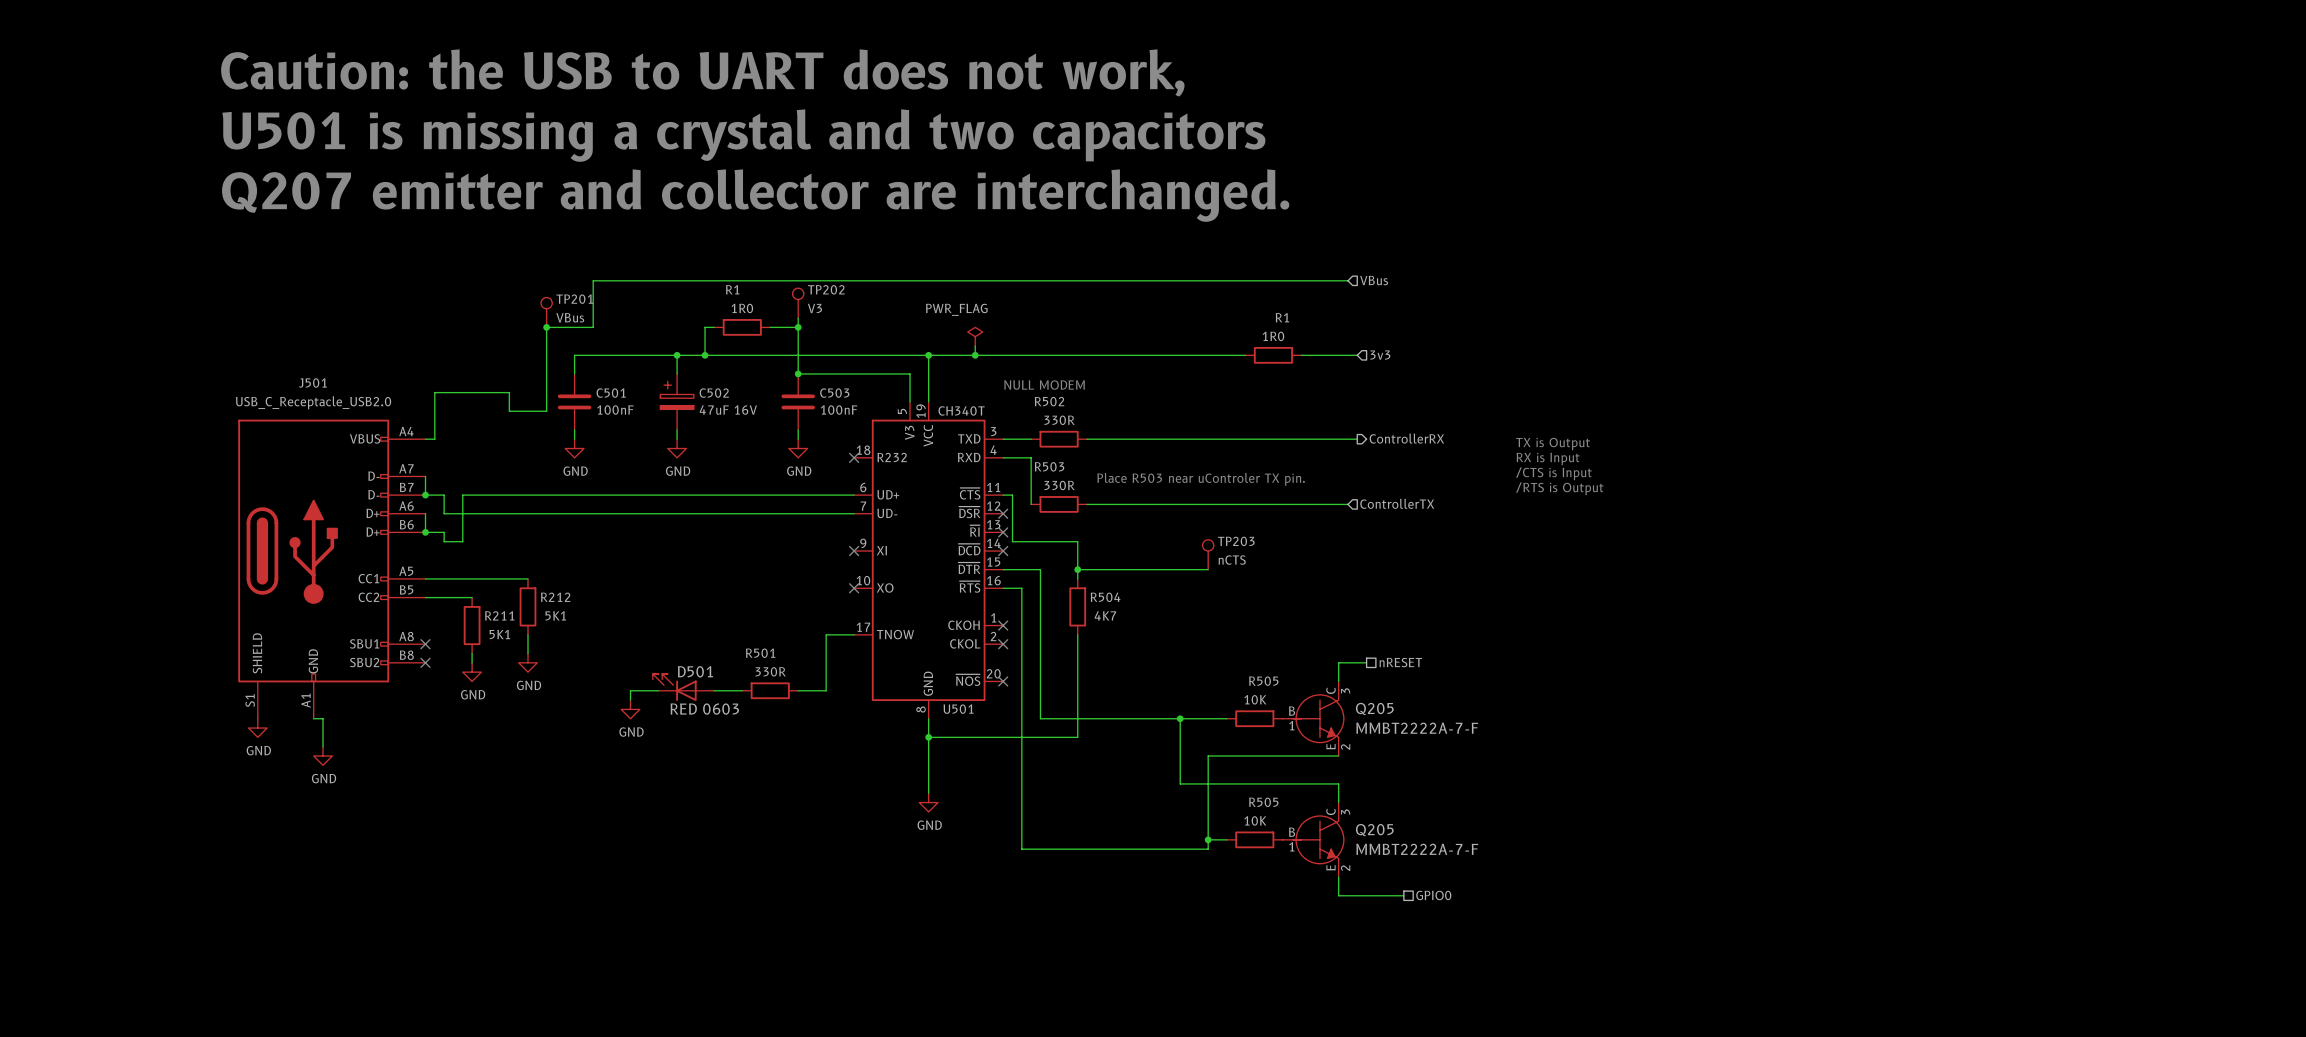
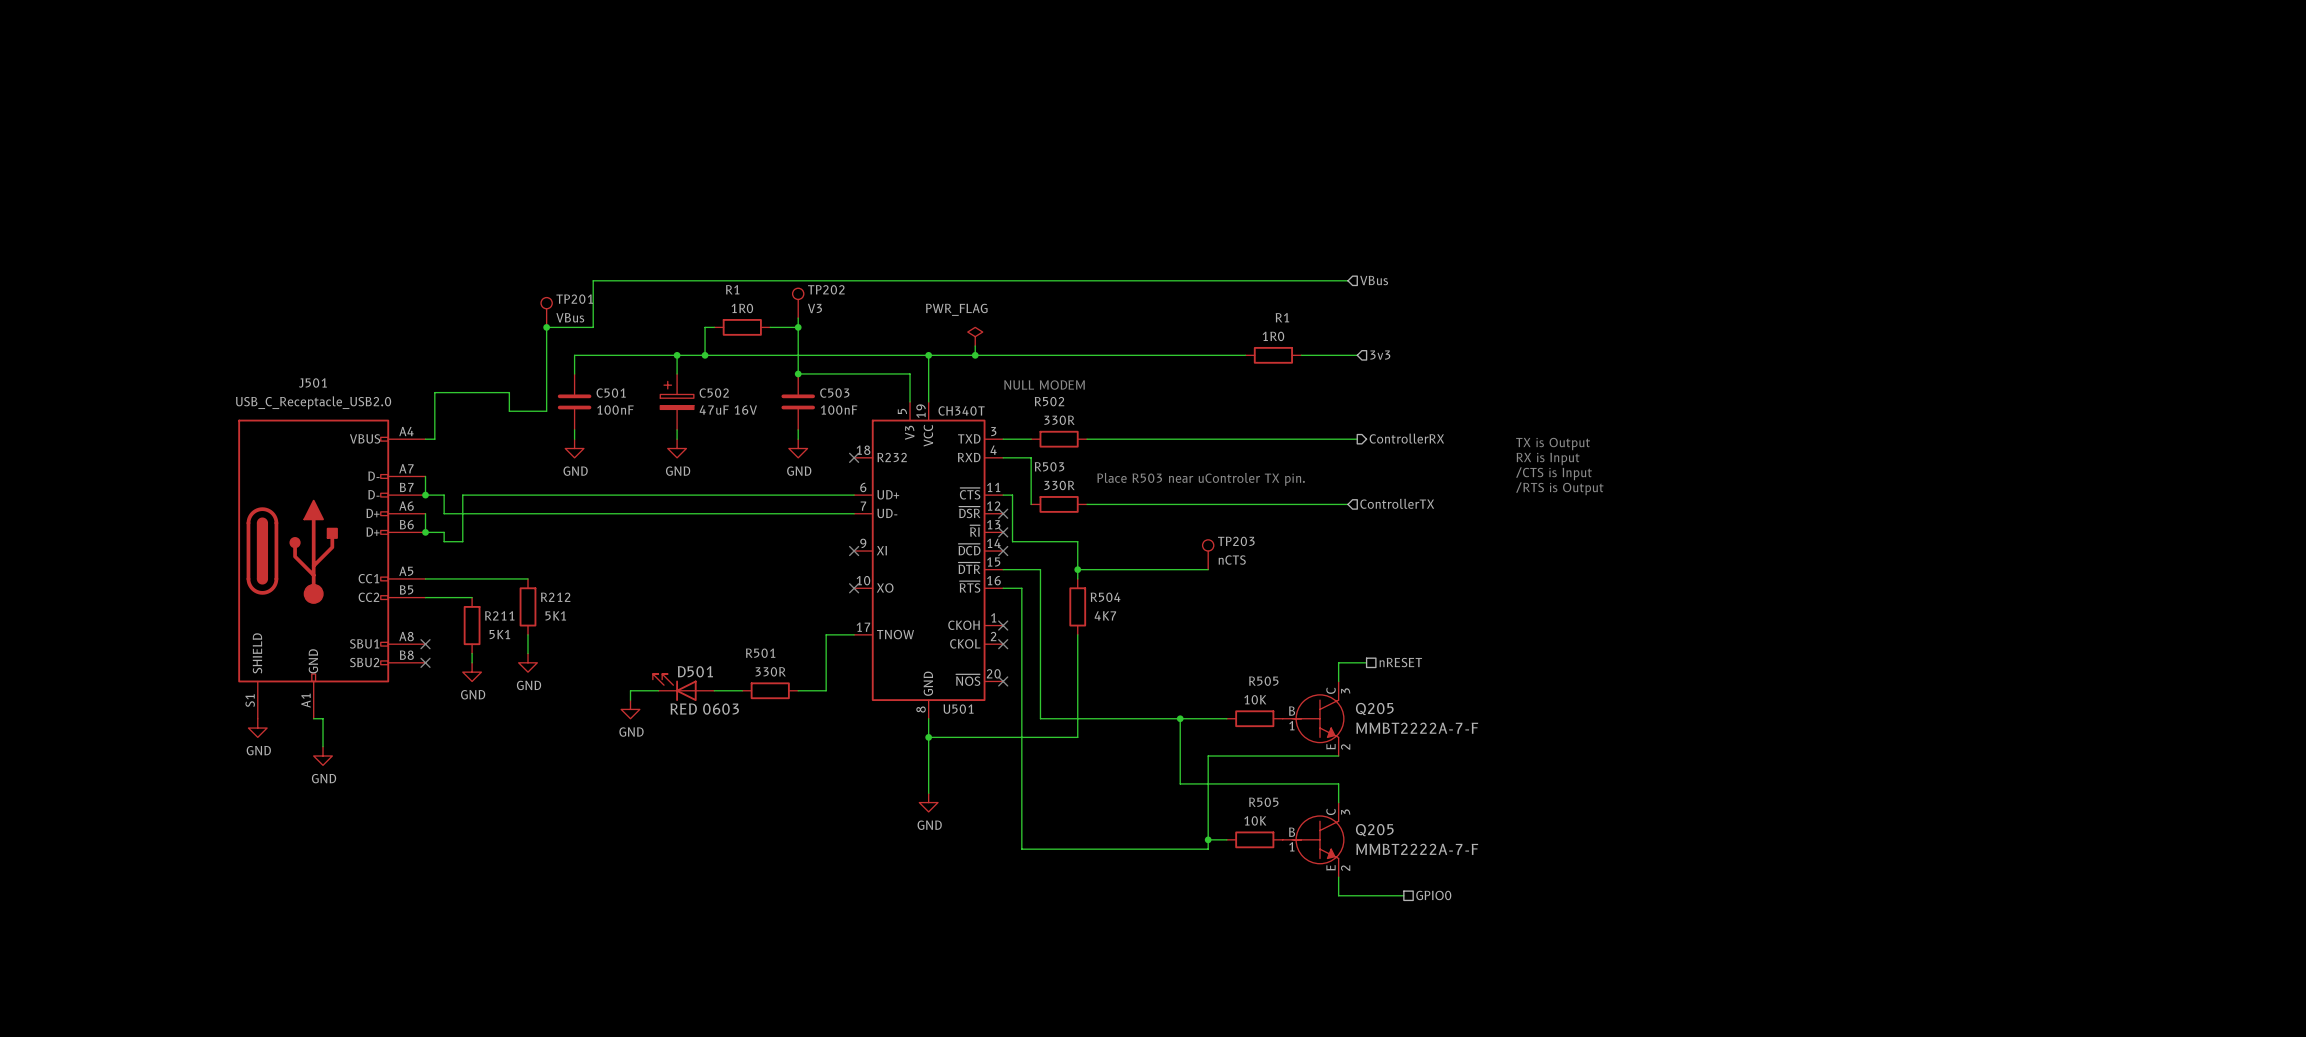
text: Caution: the USB to UART does not work, (702, 72) -> none
text: U501 is missing a crystal and two capacitors (743, 135) -> none
text: Q207 emitter and collector are interchanged. (755, 195) -> none

